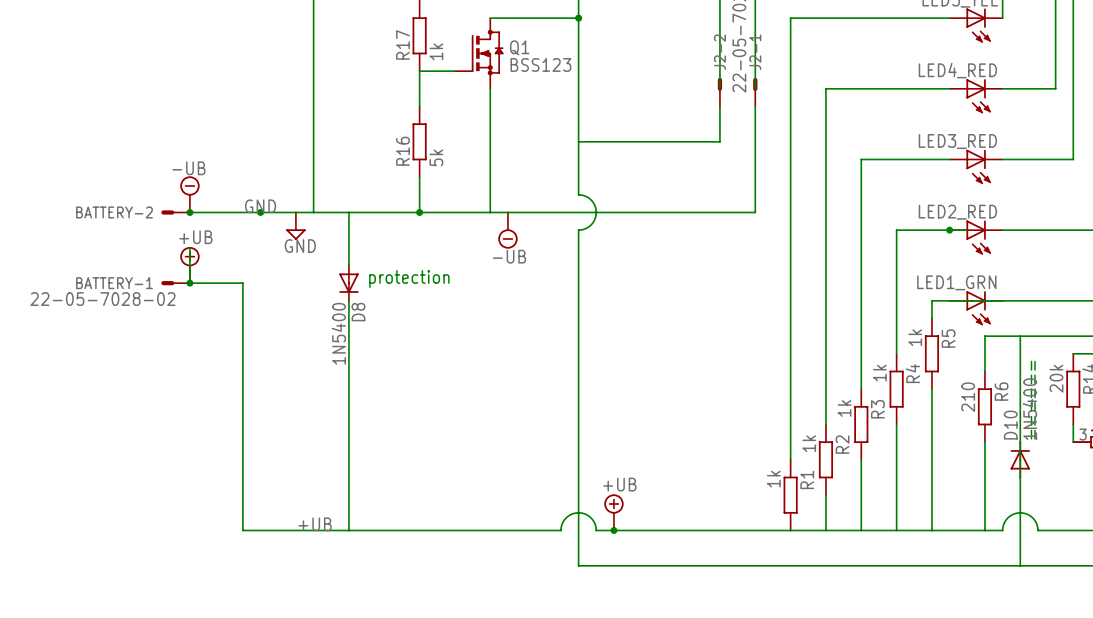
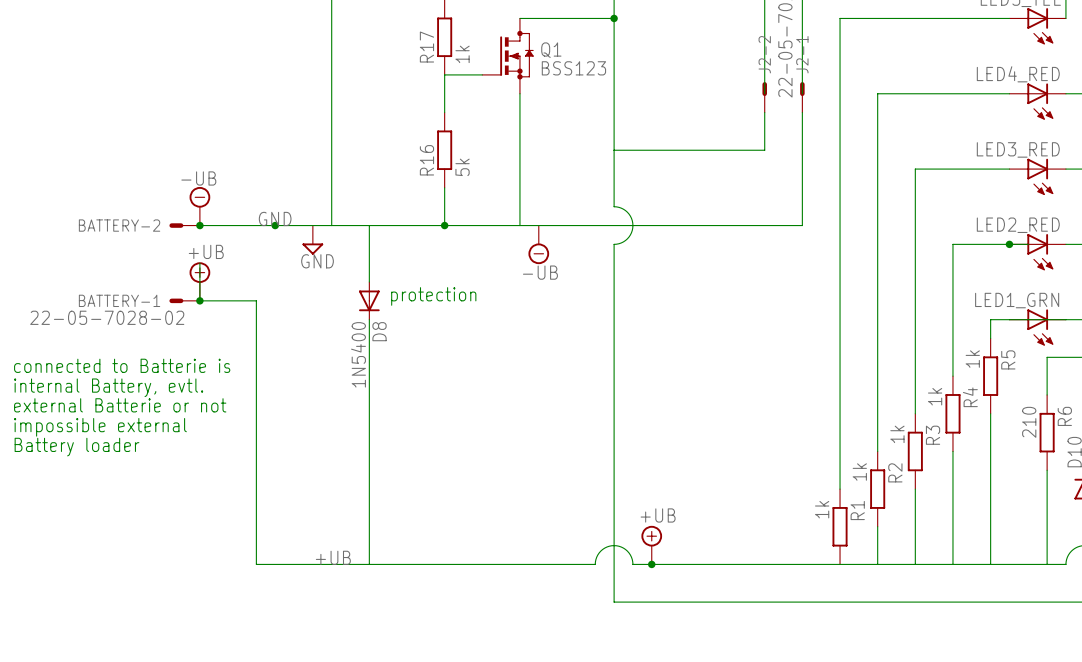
text: none -> connected to Batterie is (122, 365)
text: none -> internal Battery, evtl. (108, 387)
text: none -> external Batterie or not (120, 405)
text: none -> impossible external (100, 427)
text: none -> Battery loader (77, 447)

